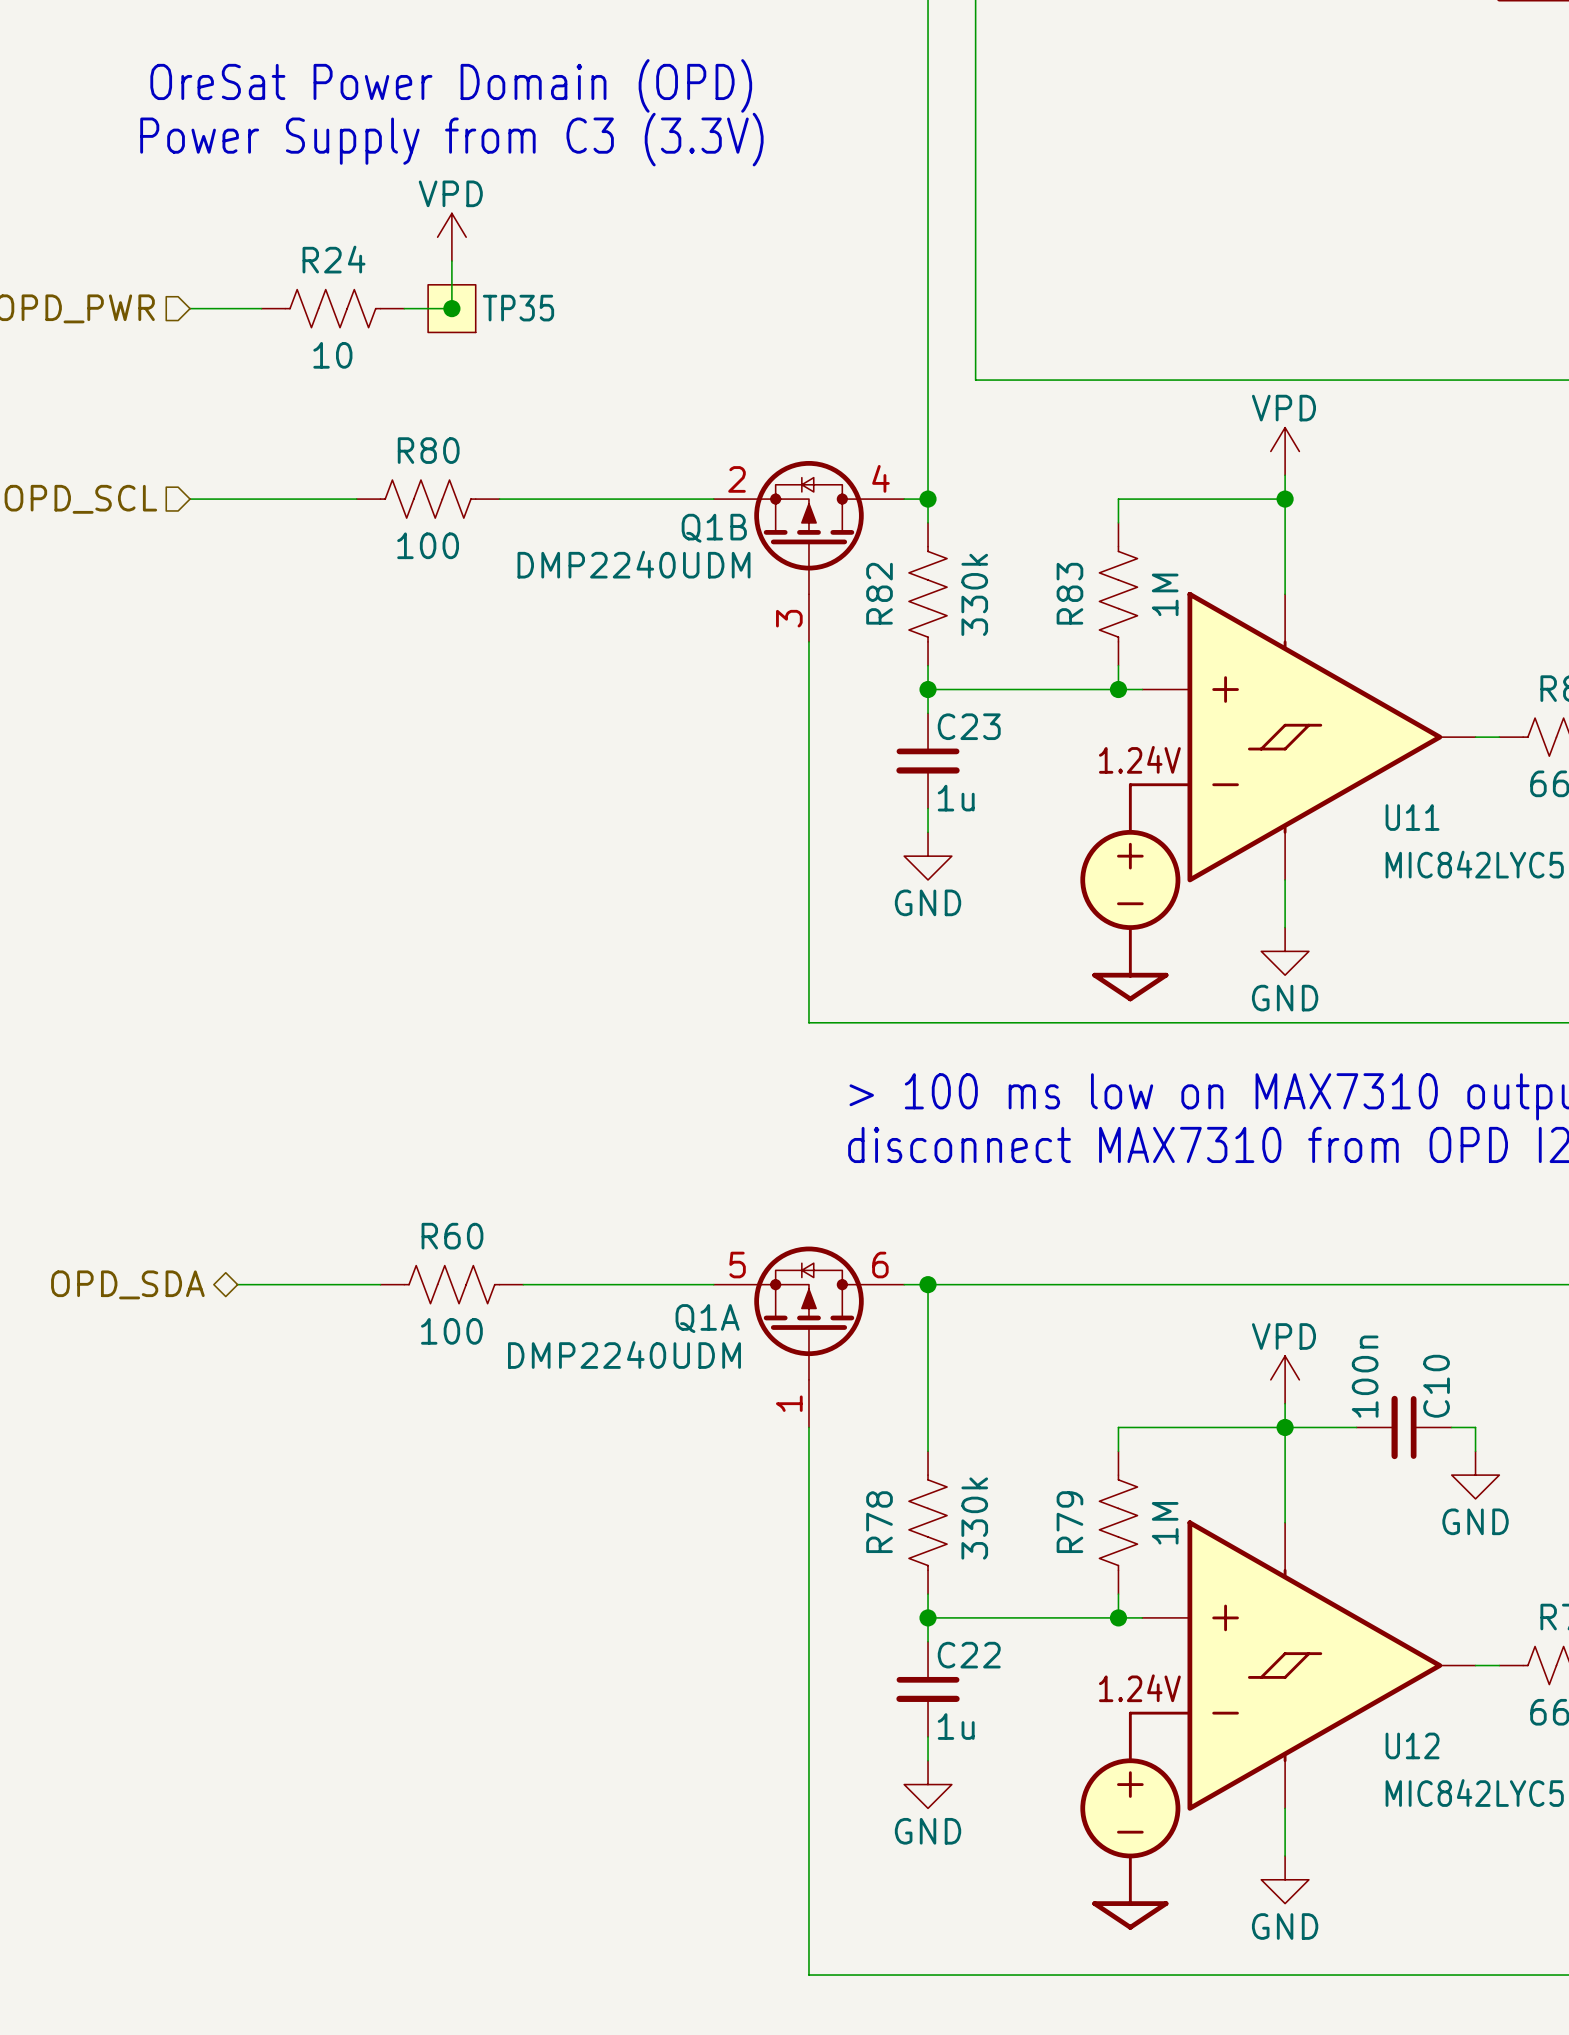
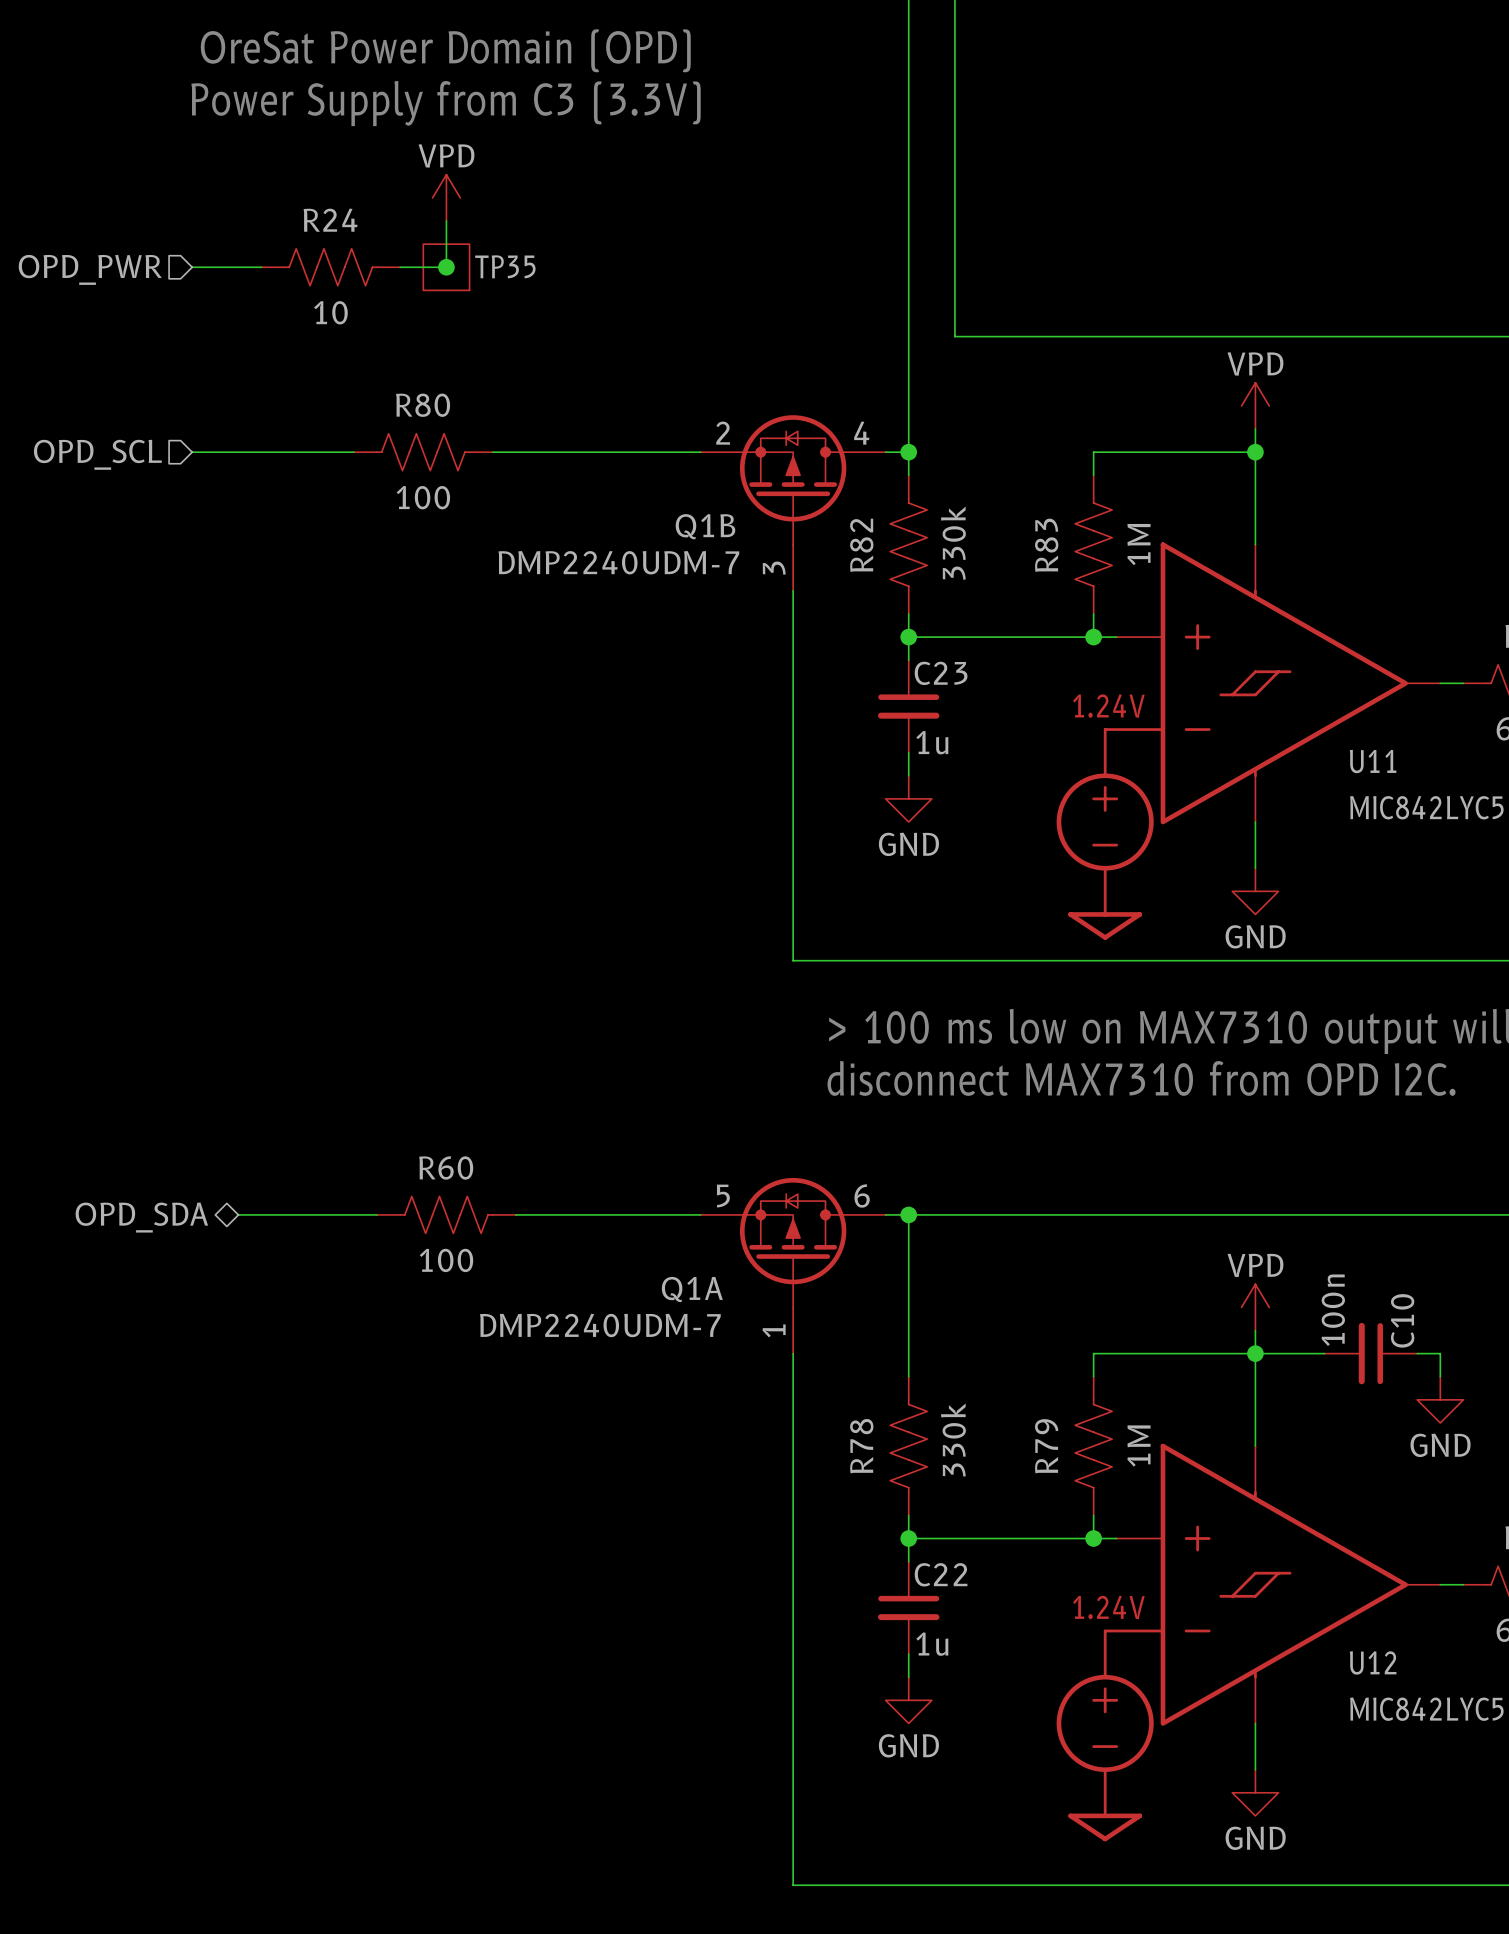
Q1B name position: Q1B (714, 528) -> Q1B (705, 526)
Q1B value: DMP2240UDM (634, 564) -> DMP2240UDM-7 (618, 562)
Q1A name position: Q1A (707, 1318) -> Q1A (692, 1289)
Q1A value: DMP2240UDM (624, 1354) -> DMP2240UDM-7 (600, 1325)

